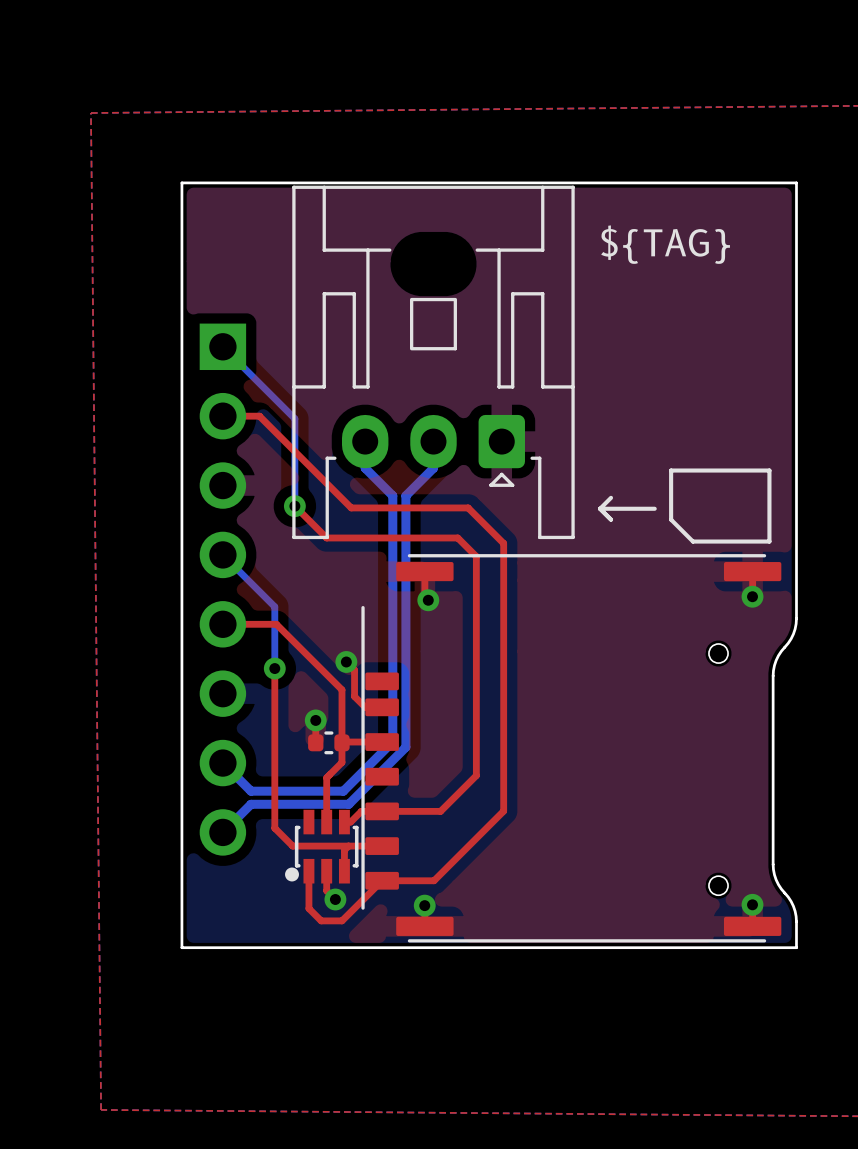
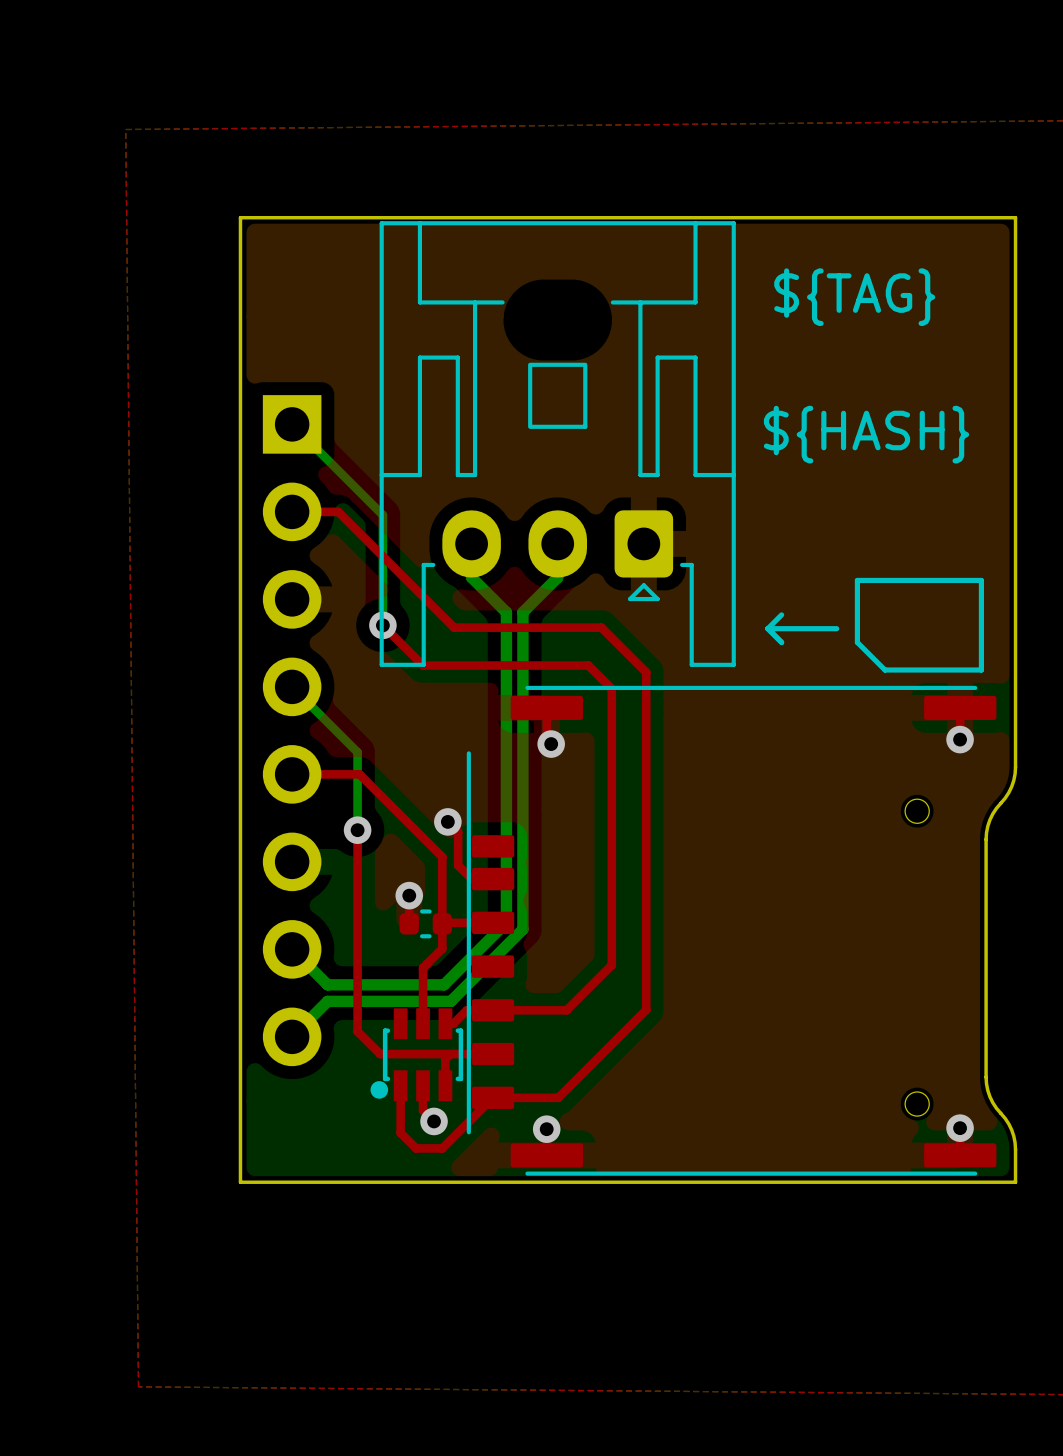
text: none -> ${HASH} (866, 434)

